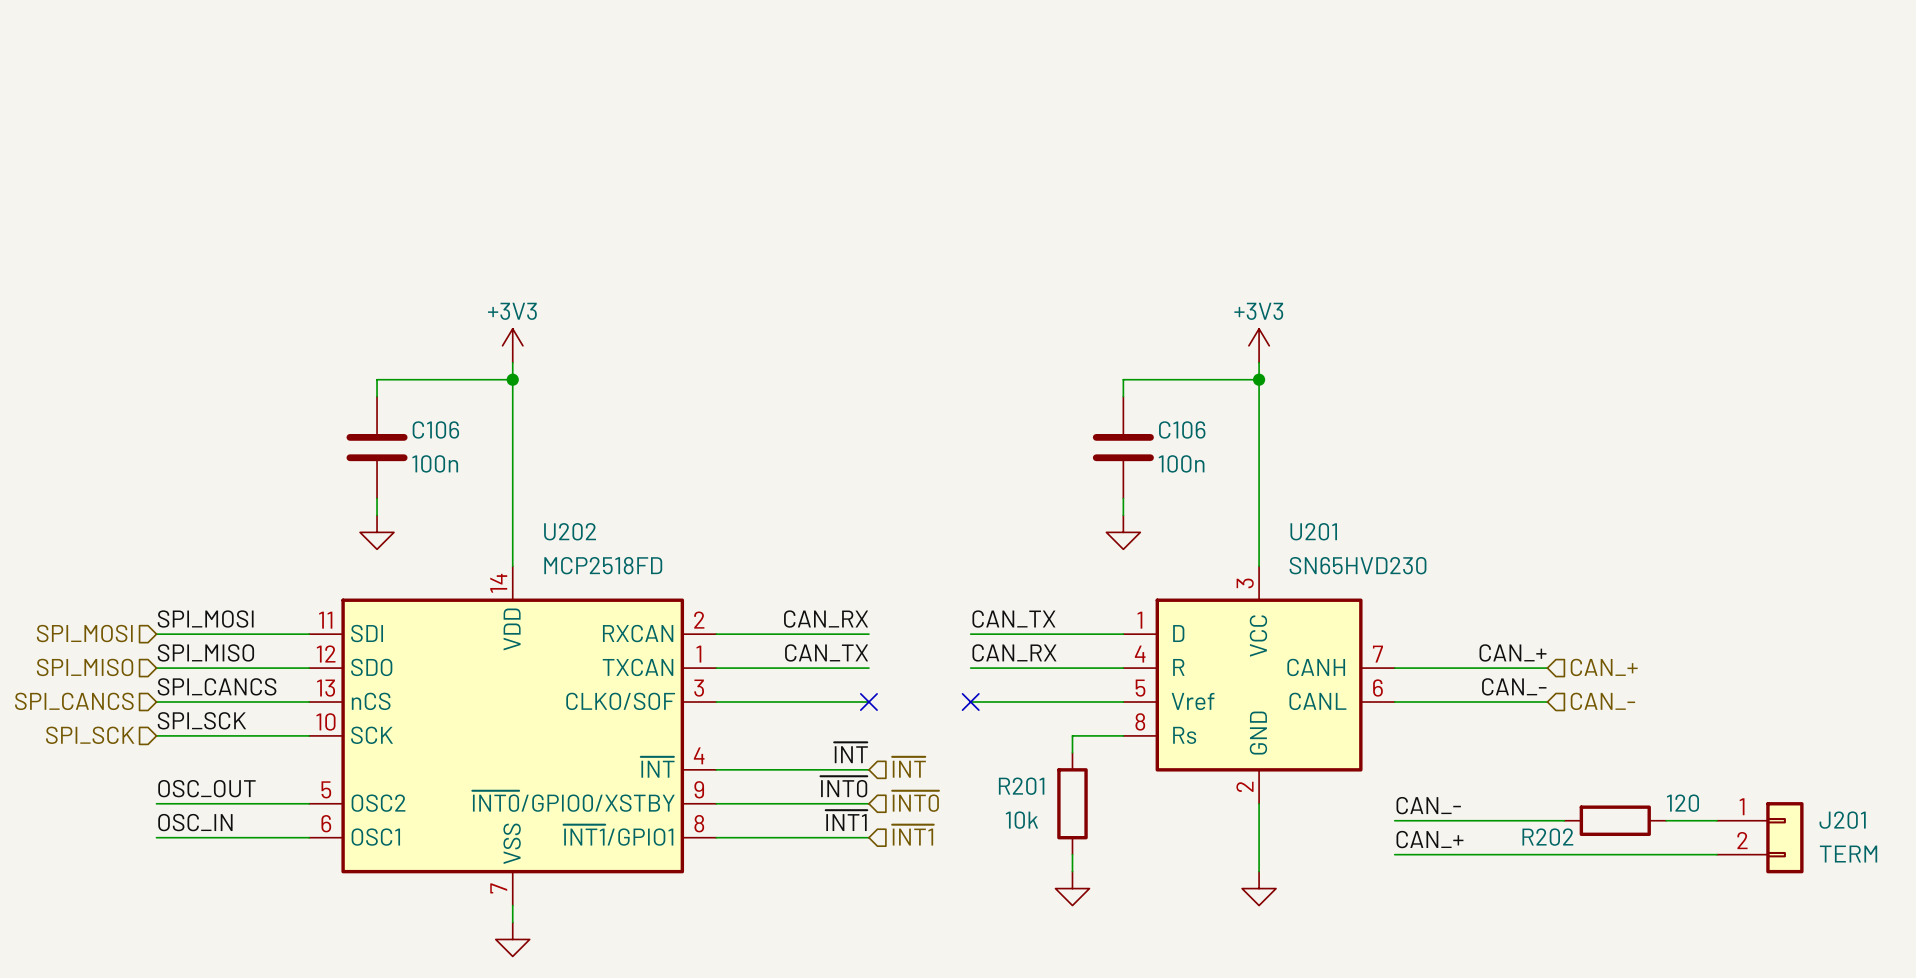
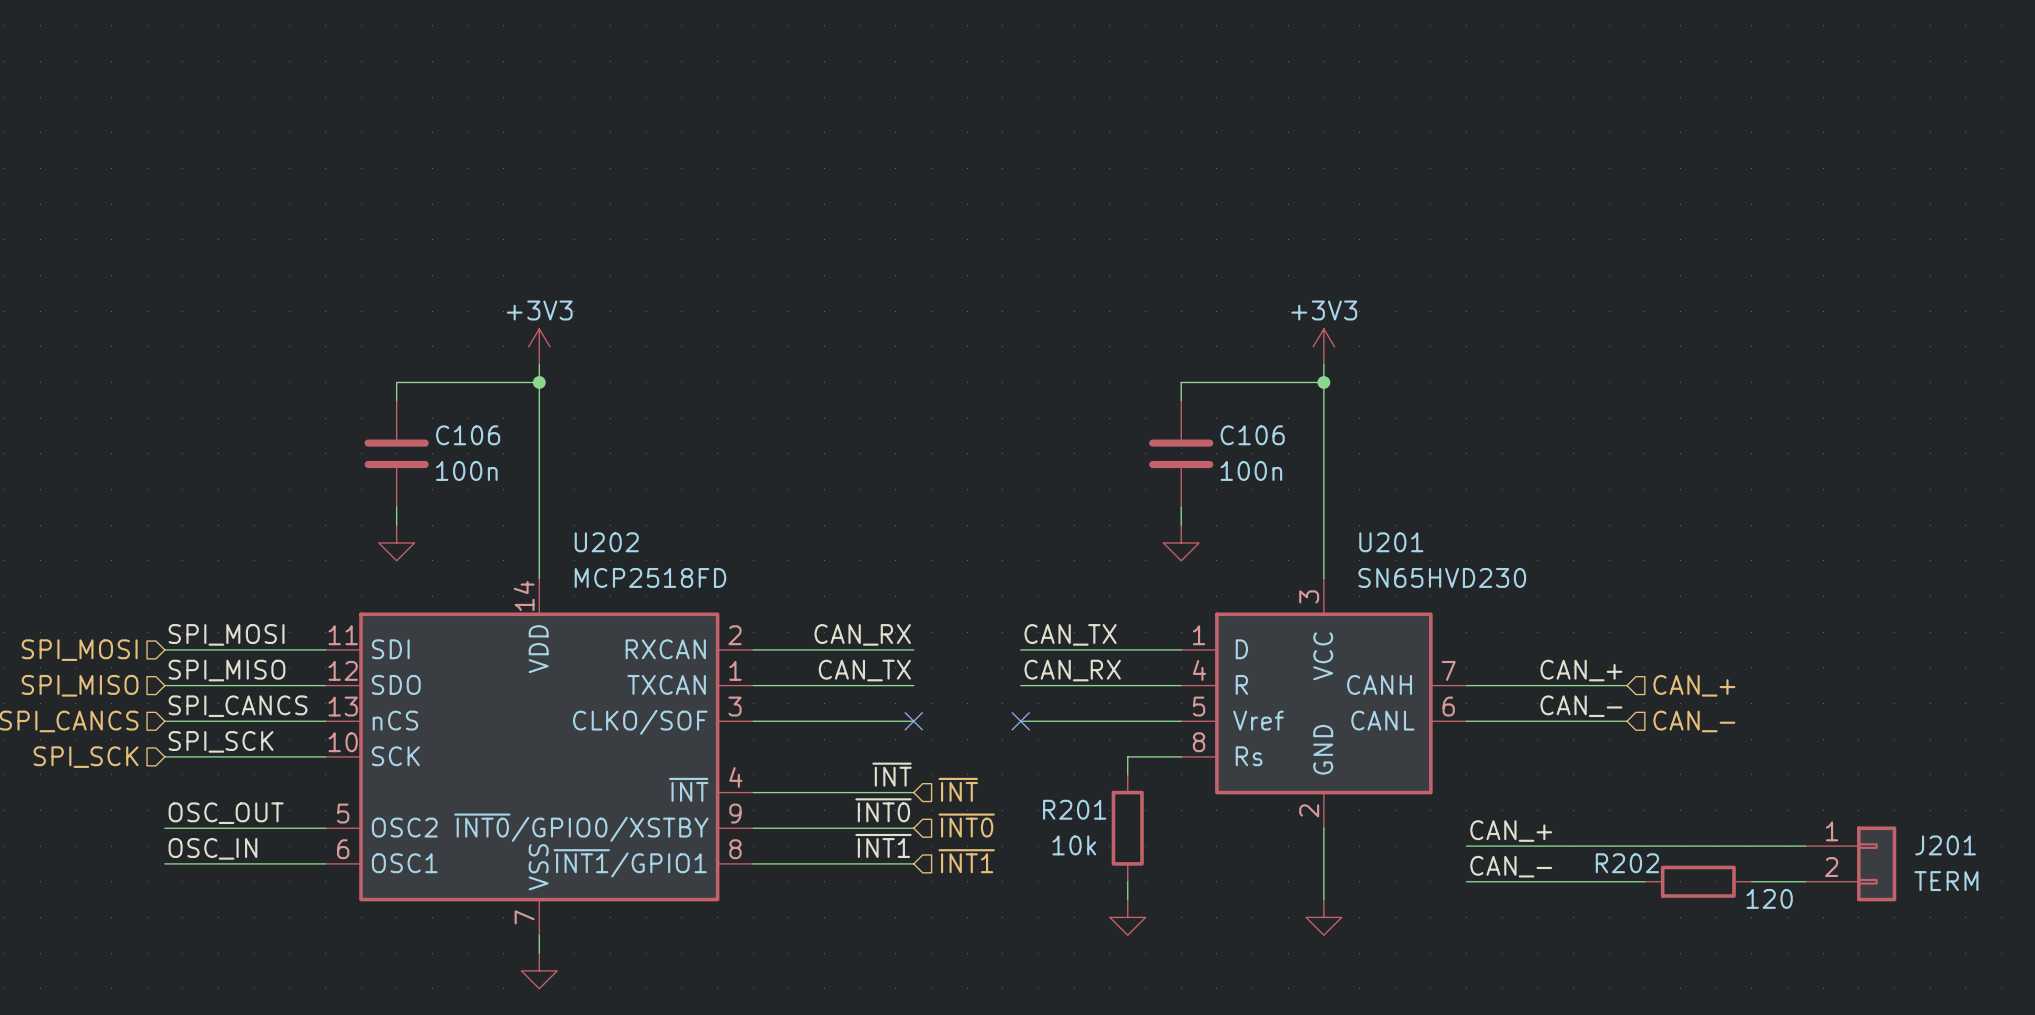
R202 value position: 120 (1682, 803) -> 120 (1769, 898)
label: CAN_- (1428, 805) -> CAN_+ (1511, 831)
R202 position: (1615, 820) -> (1698, 881)
label: CAN_+ (1429, 839) -> CAN_- (1511, 866)
wire: (1564, 854) (1666, 854) -> (1644, 846) (1751, 846)

